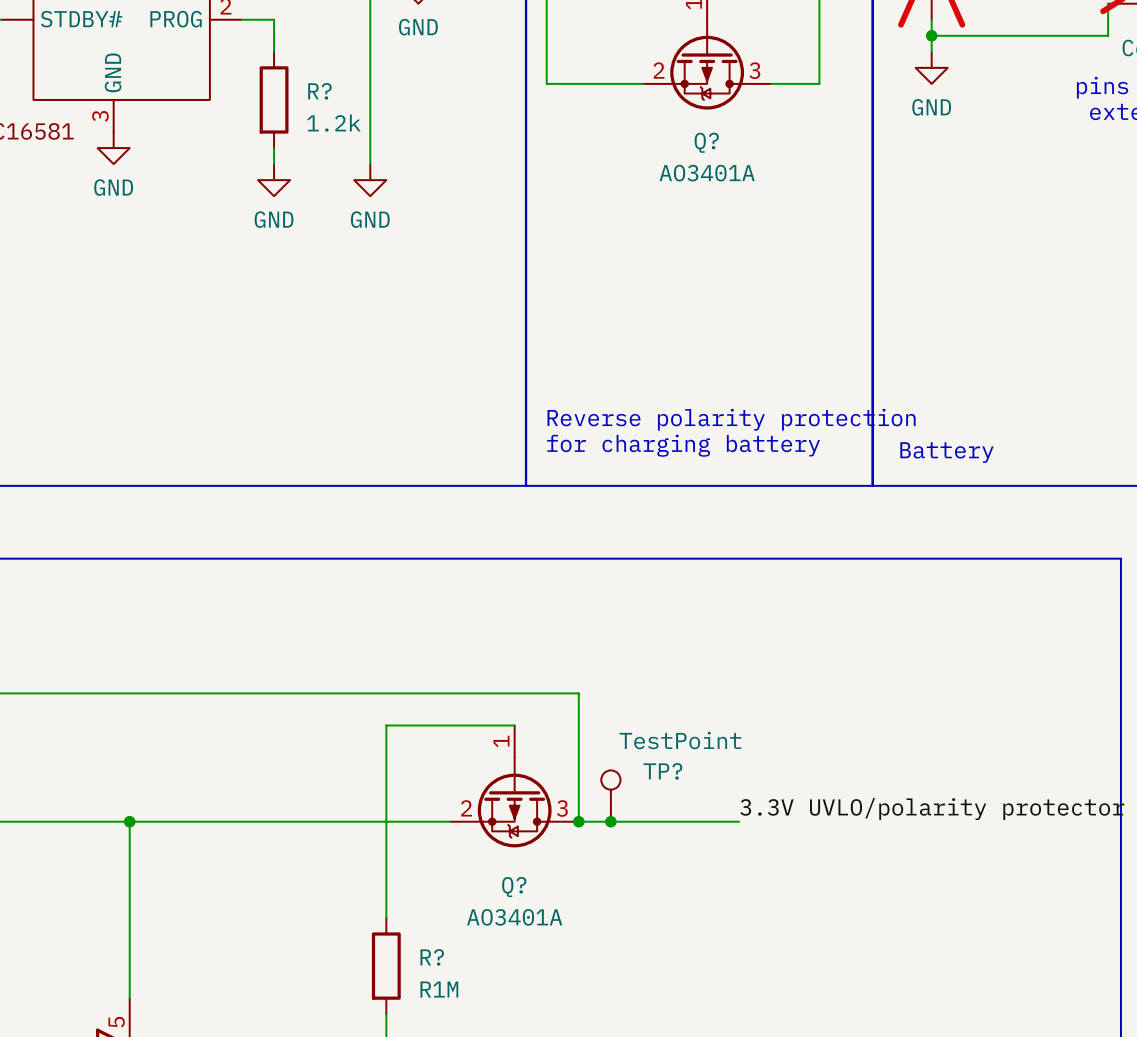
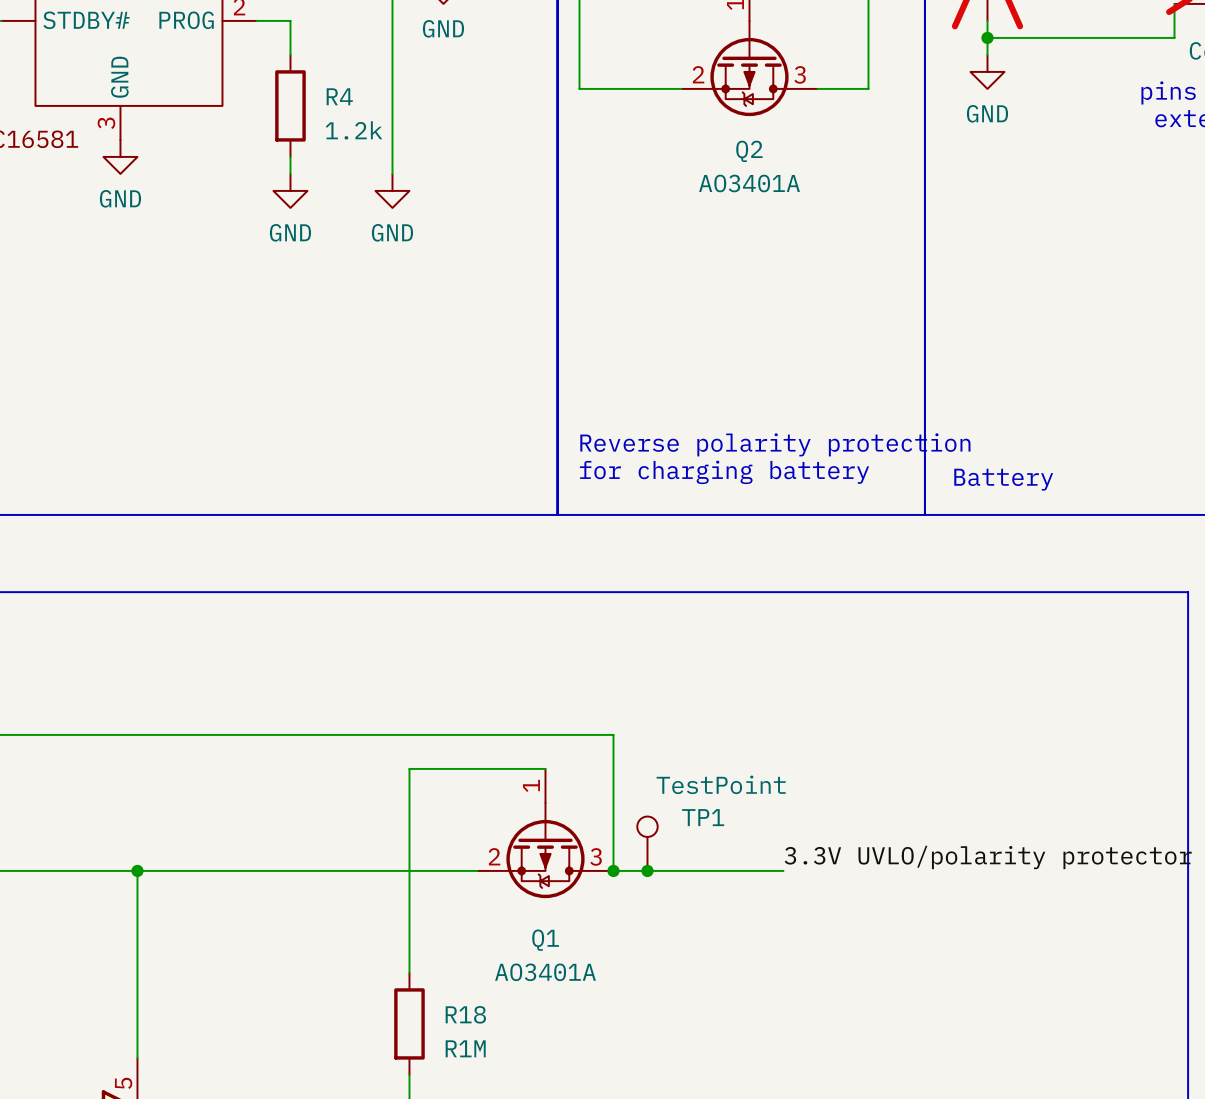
R? name: R? (319, 91) -> R4 (339, 96)
Q? name: Q? (706, 142) -> Q2 (749, 151)
TP? name: TP? (662, 771) -> TP1 (703, 817)
Q? name: Q? (514, 887) -> Q1 (545, 940)
R? name: R? (432, 957) -> R18 (465, 1014)

